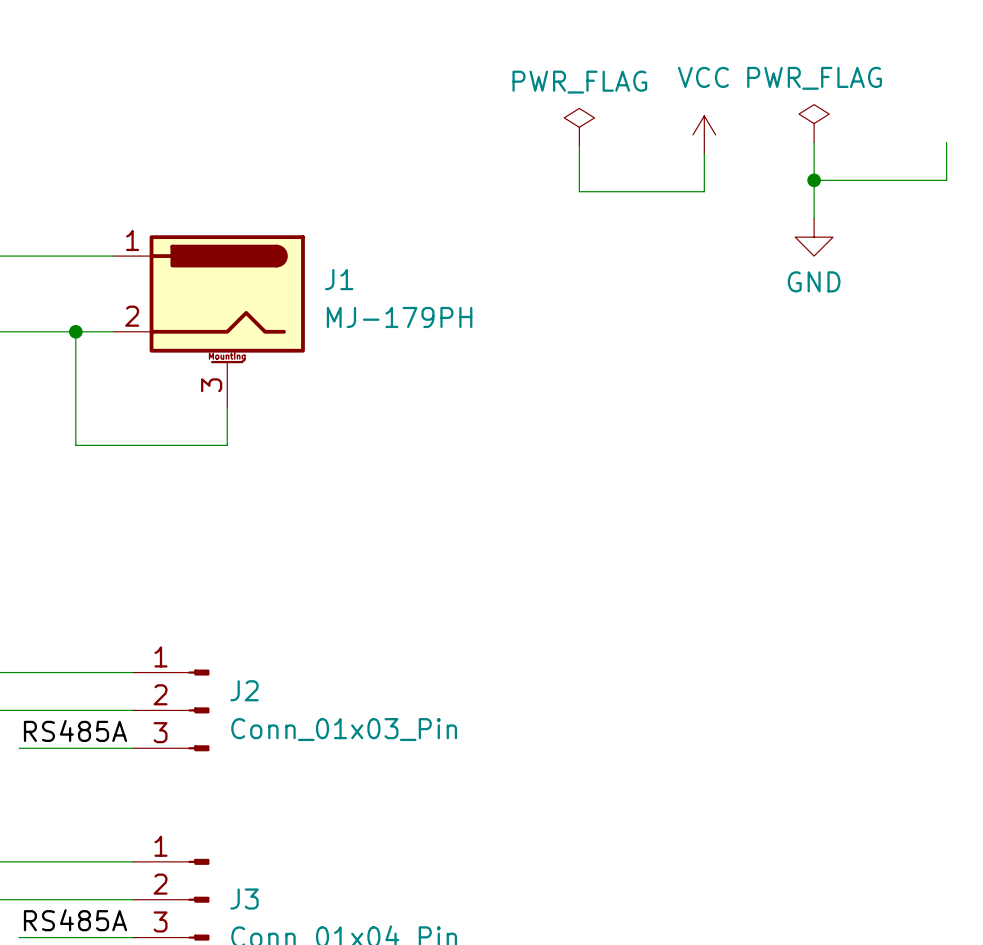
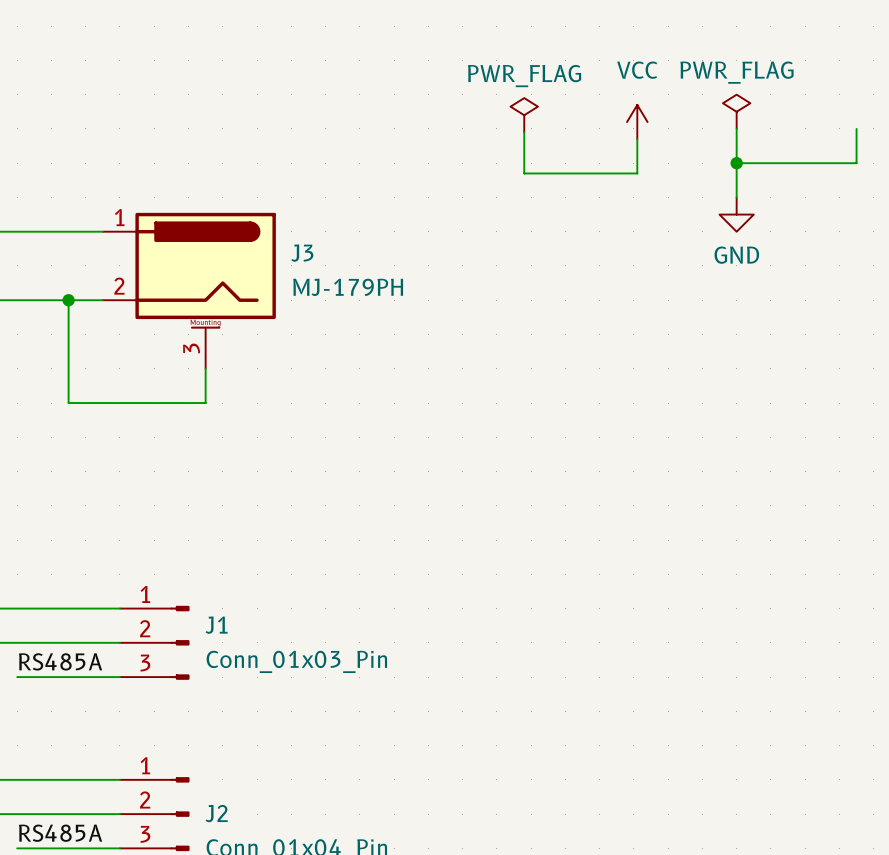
J1 name: J1 (339, 279) -> J3 (302, 253)
J2 name: J2 (244, 690) -> J1 (216, 625)
J3 name: J3 (244, 899) -> J2 (216, 813)

